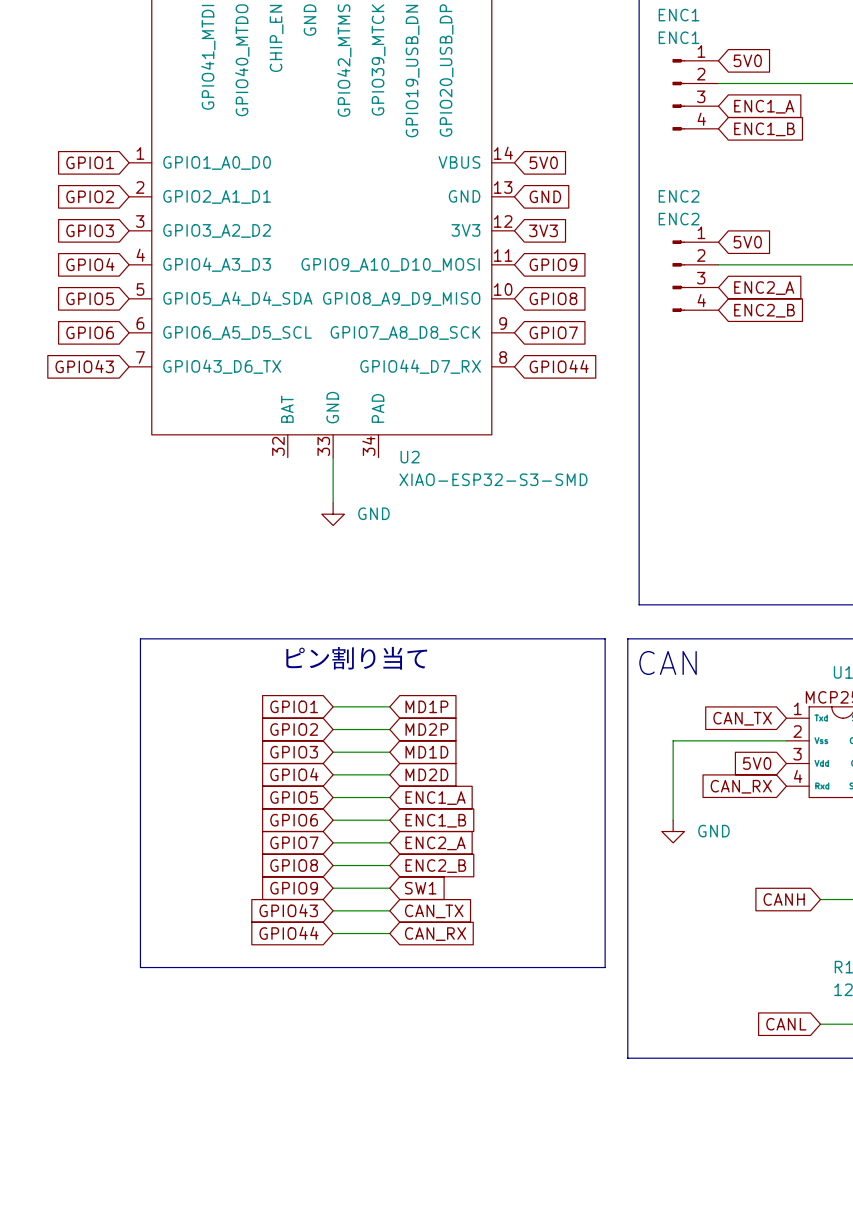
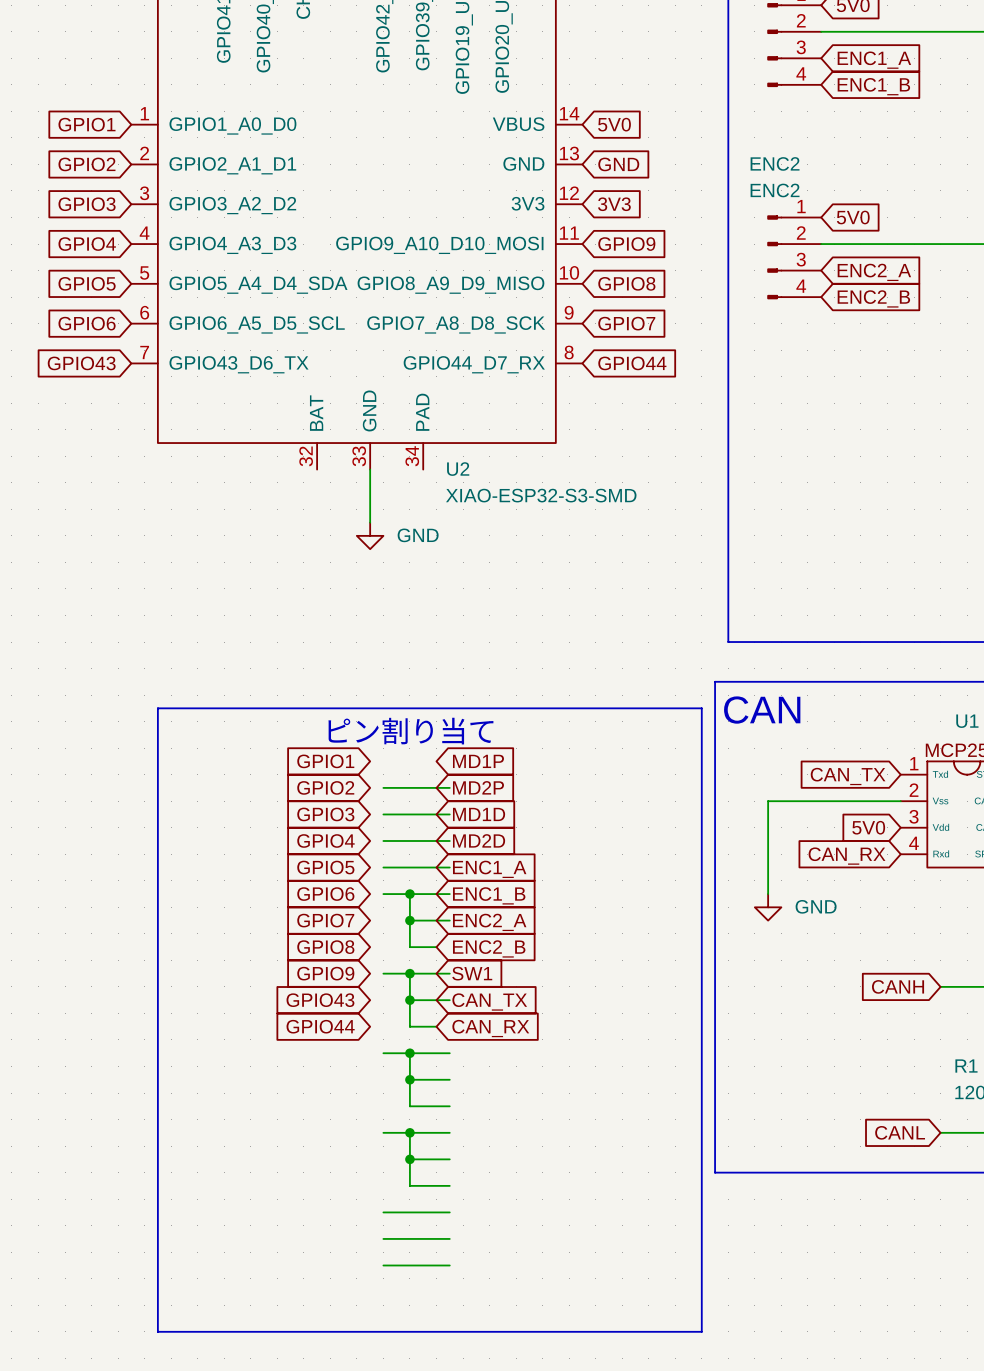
line: (140, 638) (605, 638) (605, 967) (140, 967) (140, 638) -> (157, 708) (157, 1331) (701, 1331) (701, 708) (157, 708)
text position: ピン割り当て (356, 658) -> ピン割り当て (410, 731)
wire: (333, 706) (389, 706) -> none
wire: (333, 729) (344, 729) -> (436, 787) (449, 787)
wire: (333, 752) (344, 752) -> (436, 814) (449, 814)
wire: (333, 774) (344, 774) -> (436, 840) (449, 840)
wire: (333, 797) (344, 797) -> (436, 867) (449, 867)
wire: (333, 820) (344, 820) -> (436, 894) (449, 894)
junction: none -> (409, 894)
wire: (333, 842) (367, 842) -> (409, 1079) (449, 1079)
junction: none -> (409, 920)
wire: none -> (436, 920) (449, 920)
wire: (333, 865) (367, 865) -> (409, 894) (409, 947)
wire: (333, 888) (344, 888) -> (436, 973) (449, 973)
junction: none -> (409, 973)
wire: (333, 910) (367, 910) -> (409, 1159) (449, 1159)
junction: none -> (409, 1000)
wire: none -> (436, 1000) (449, 1000)
wire: (333, 933) (367, 933) -> (409, 973) (409, 1026)
wire: none -> (383, 1053) (449, 1053)
wire: none -> (409, 1053) (409, 1106) (449, 1106)
junction: none -> (409, 1053)
junction: none -> (409, 1079)
wire: none -> (383, 1132) (449, 1132)
wire: none -> (409, 1132) (409, 1185) (449, 1185)
junction: none -> (409, 1132)
junction: none -> (409, 1159)
wire: none -> (383, 1212) (449, 1212)
wire: none -> (383, 1238) (449, 1238)
wire: none -> (383, 1265) (449, 1265)

